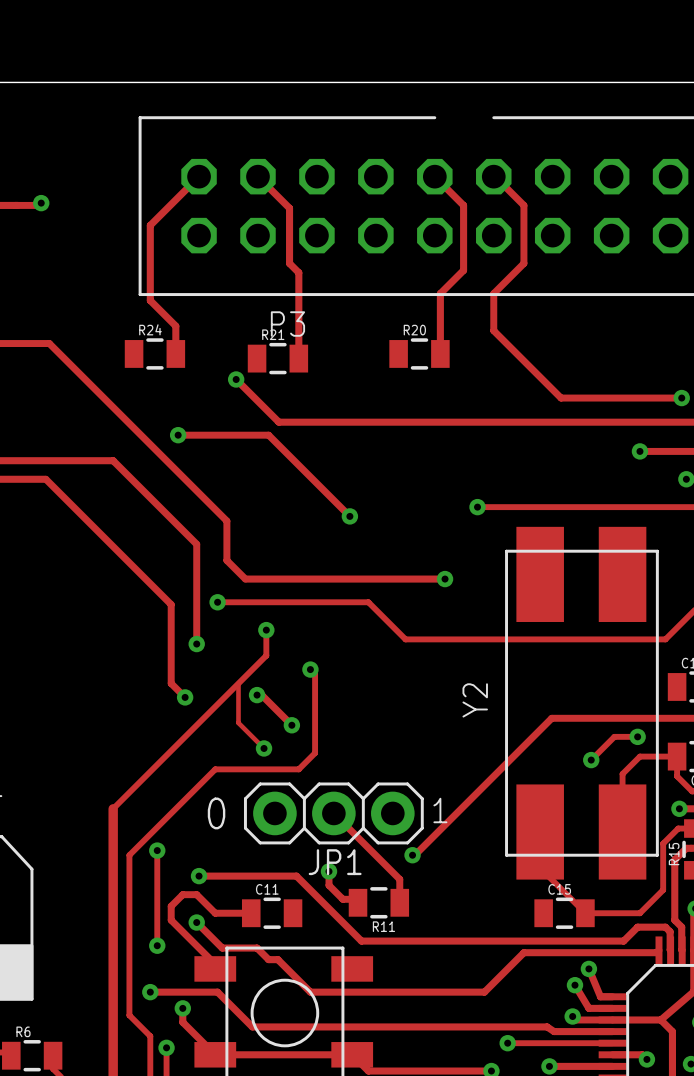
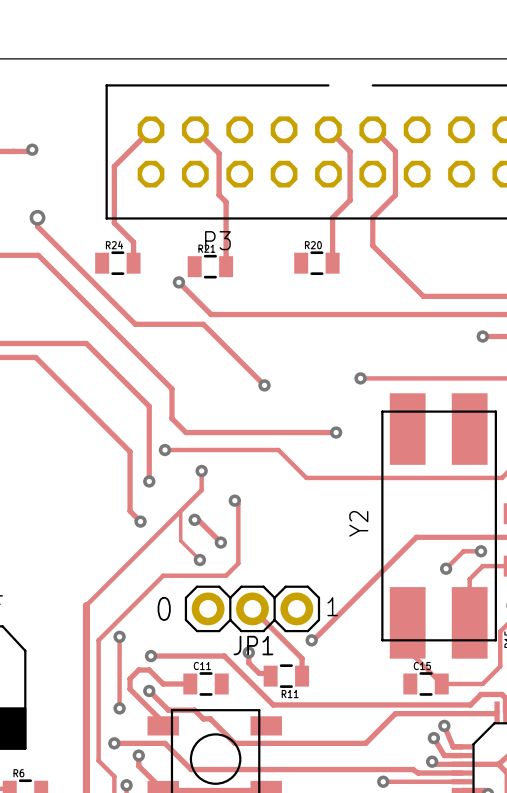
track: none -> (37, 217) (37, 226) (135, 324)
via: none -> (37, 217)
via: (178, 435) -> none

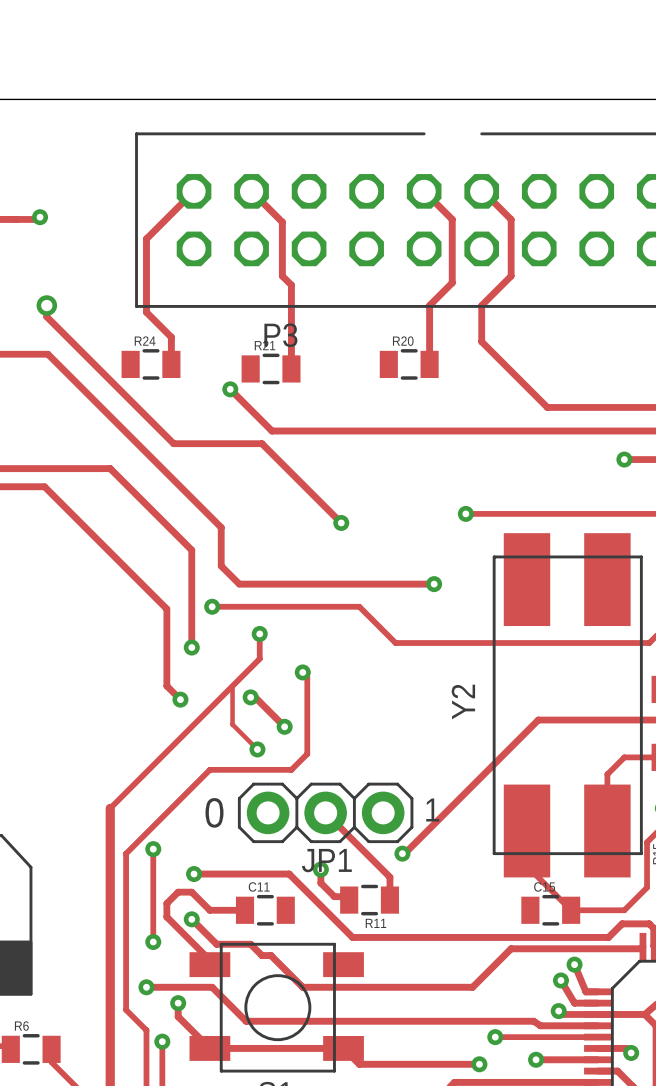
track: (481, 551) (463, 551) (446, 568) -> none
via: (481, 551) -> none
via: (446, 568) -> none

